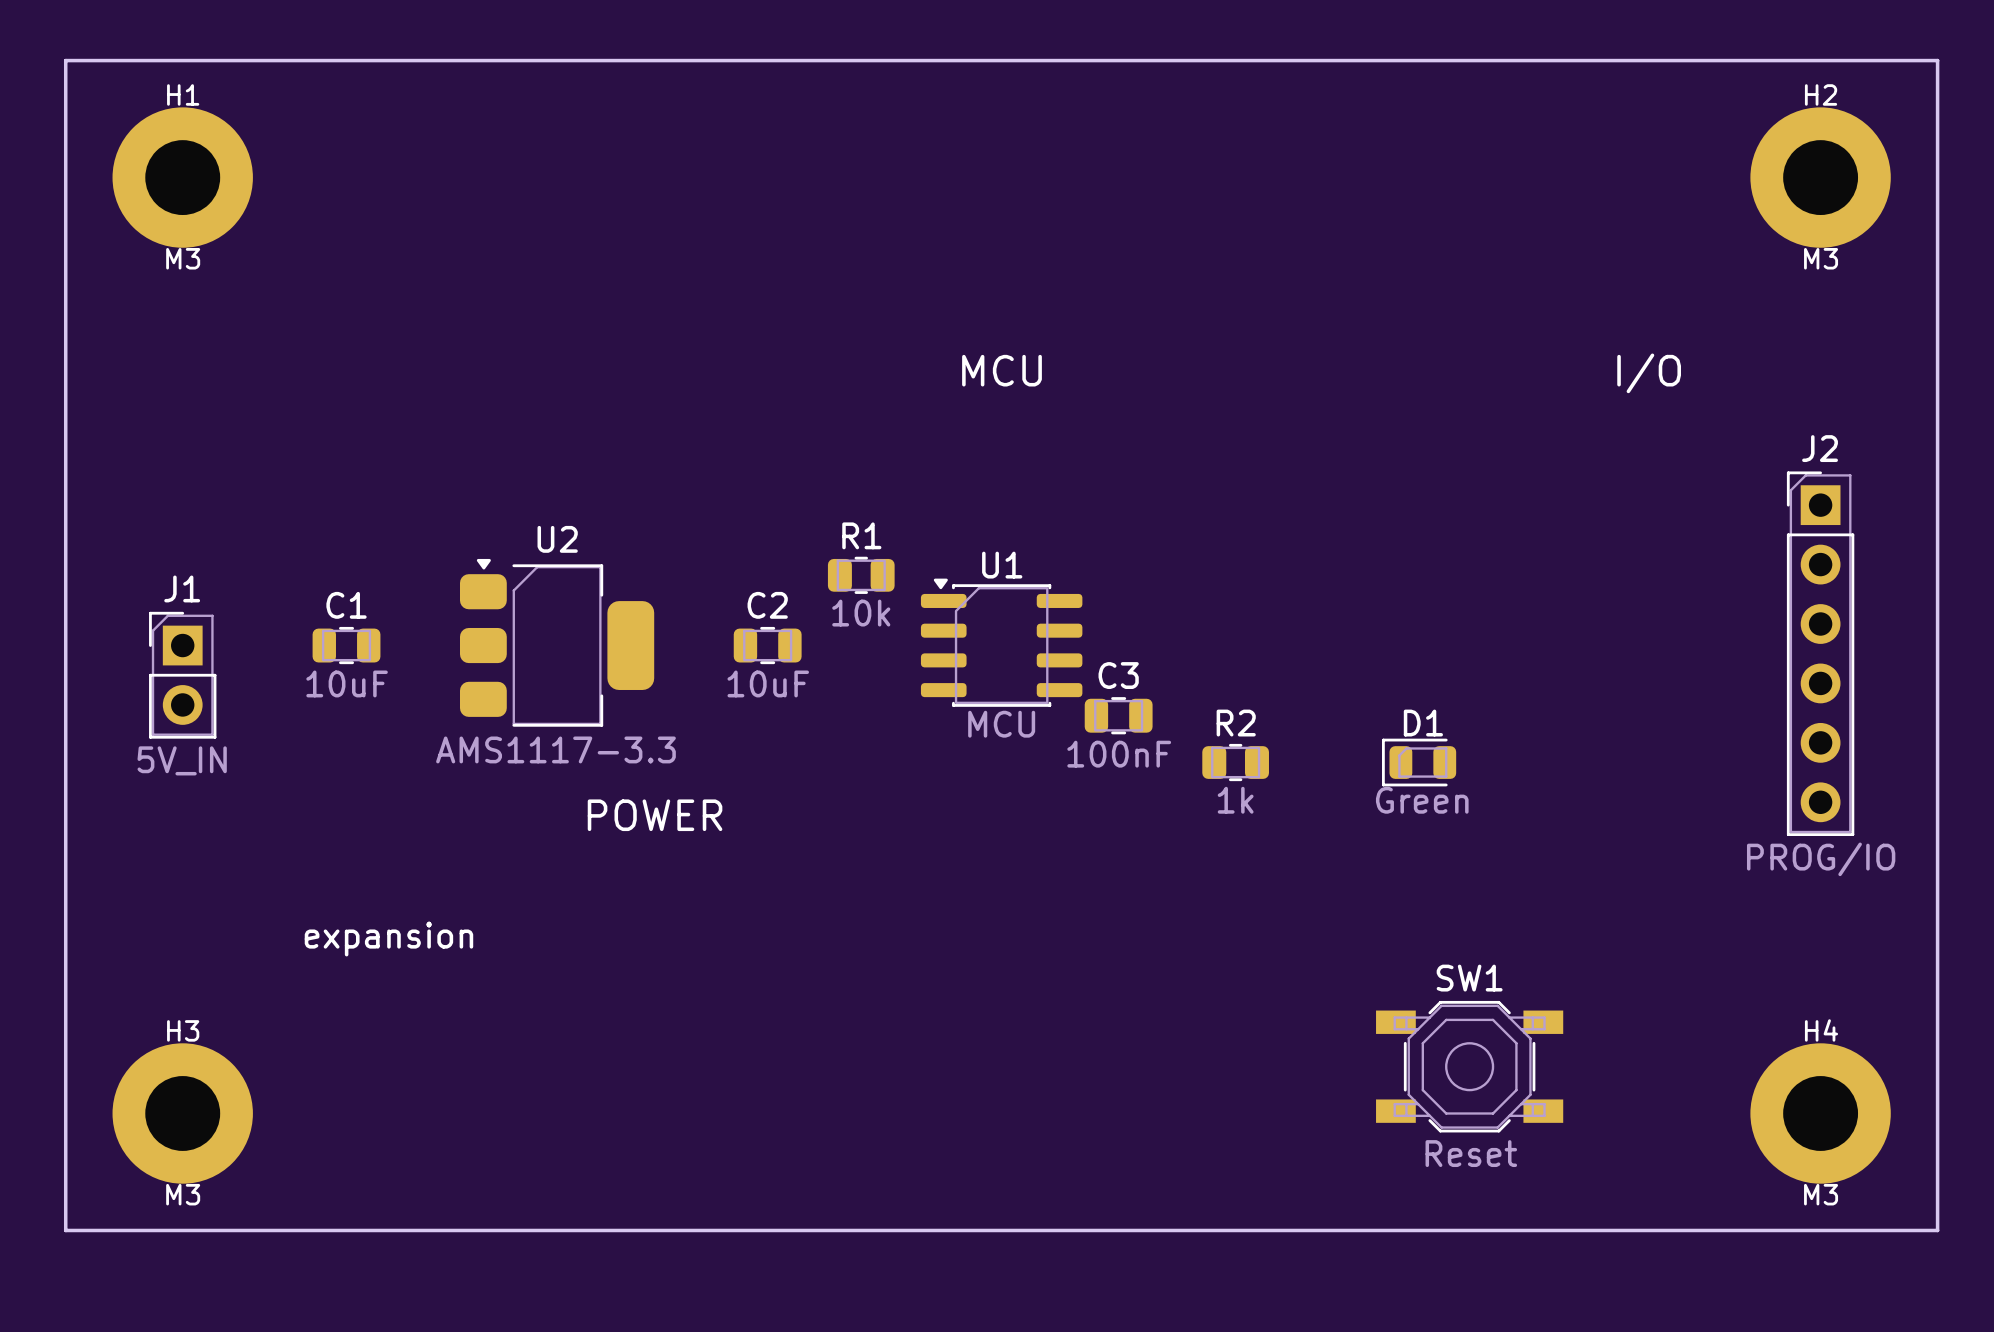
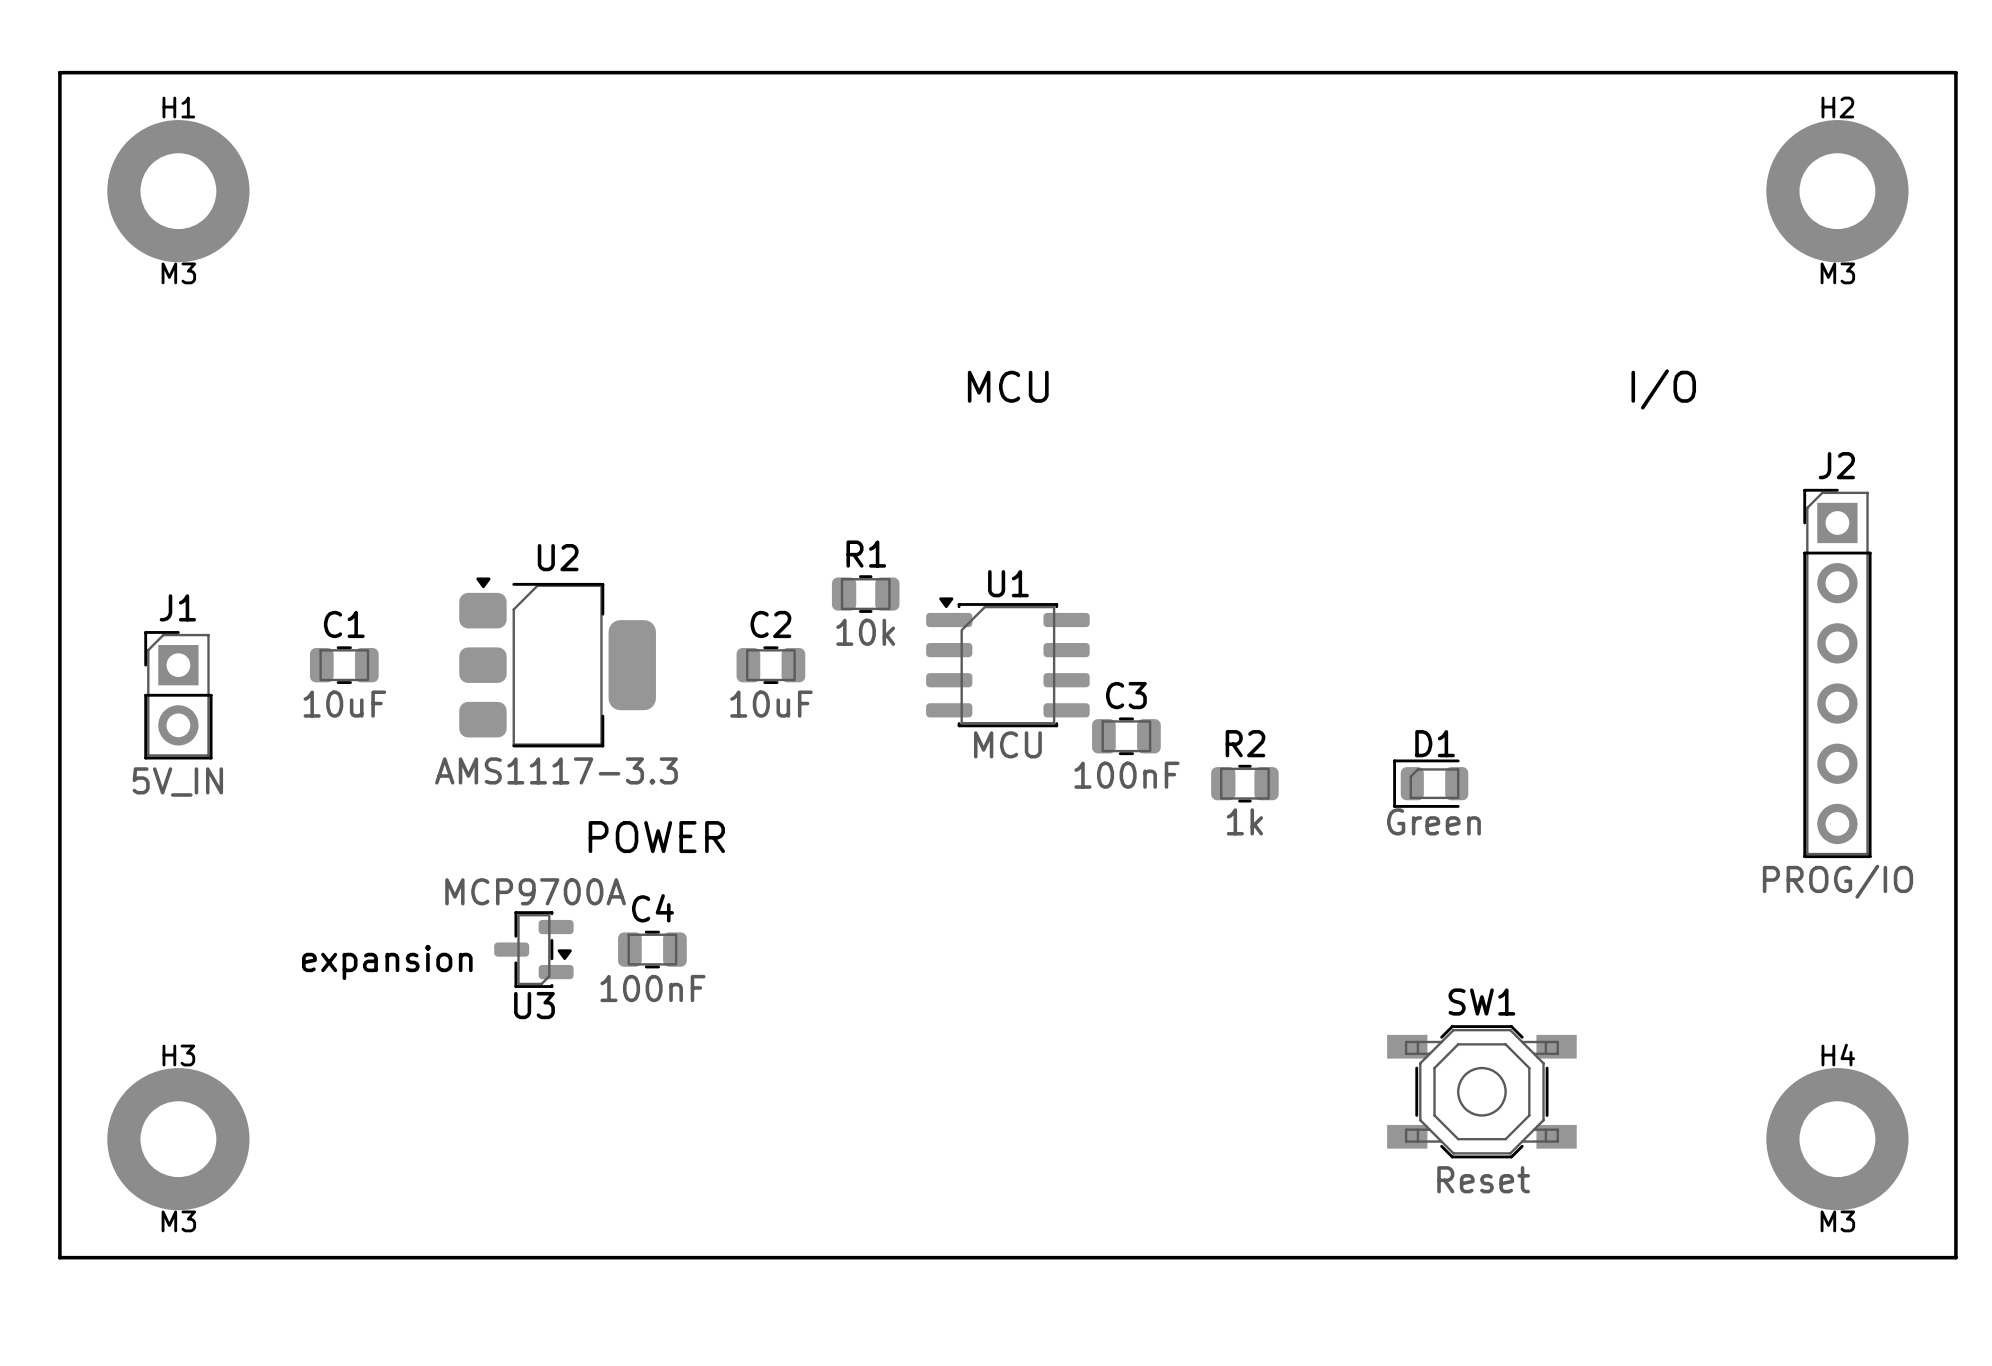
U3: none -> MCP9700A (533, 949)
C4: none -> 100nF (652, 949)

